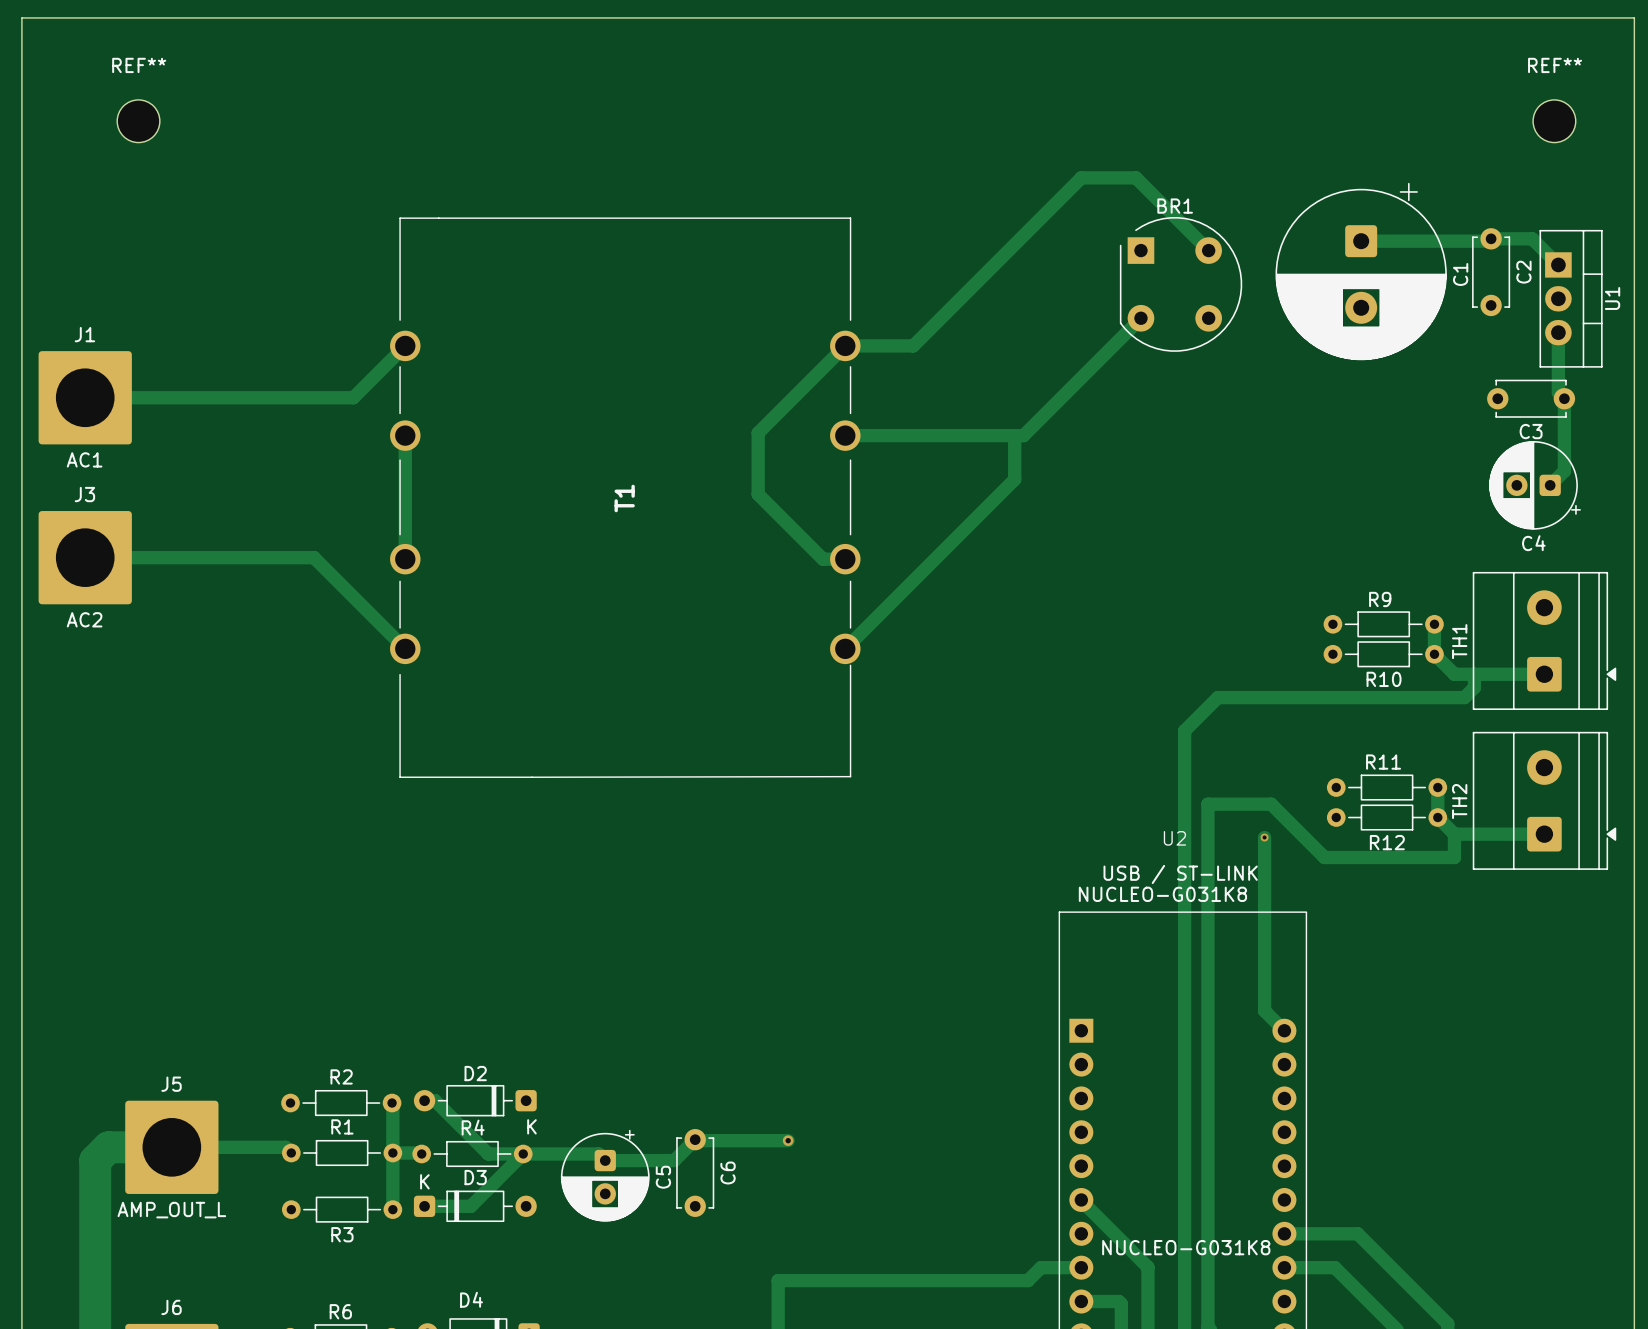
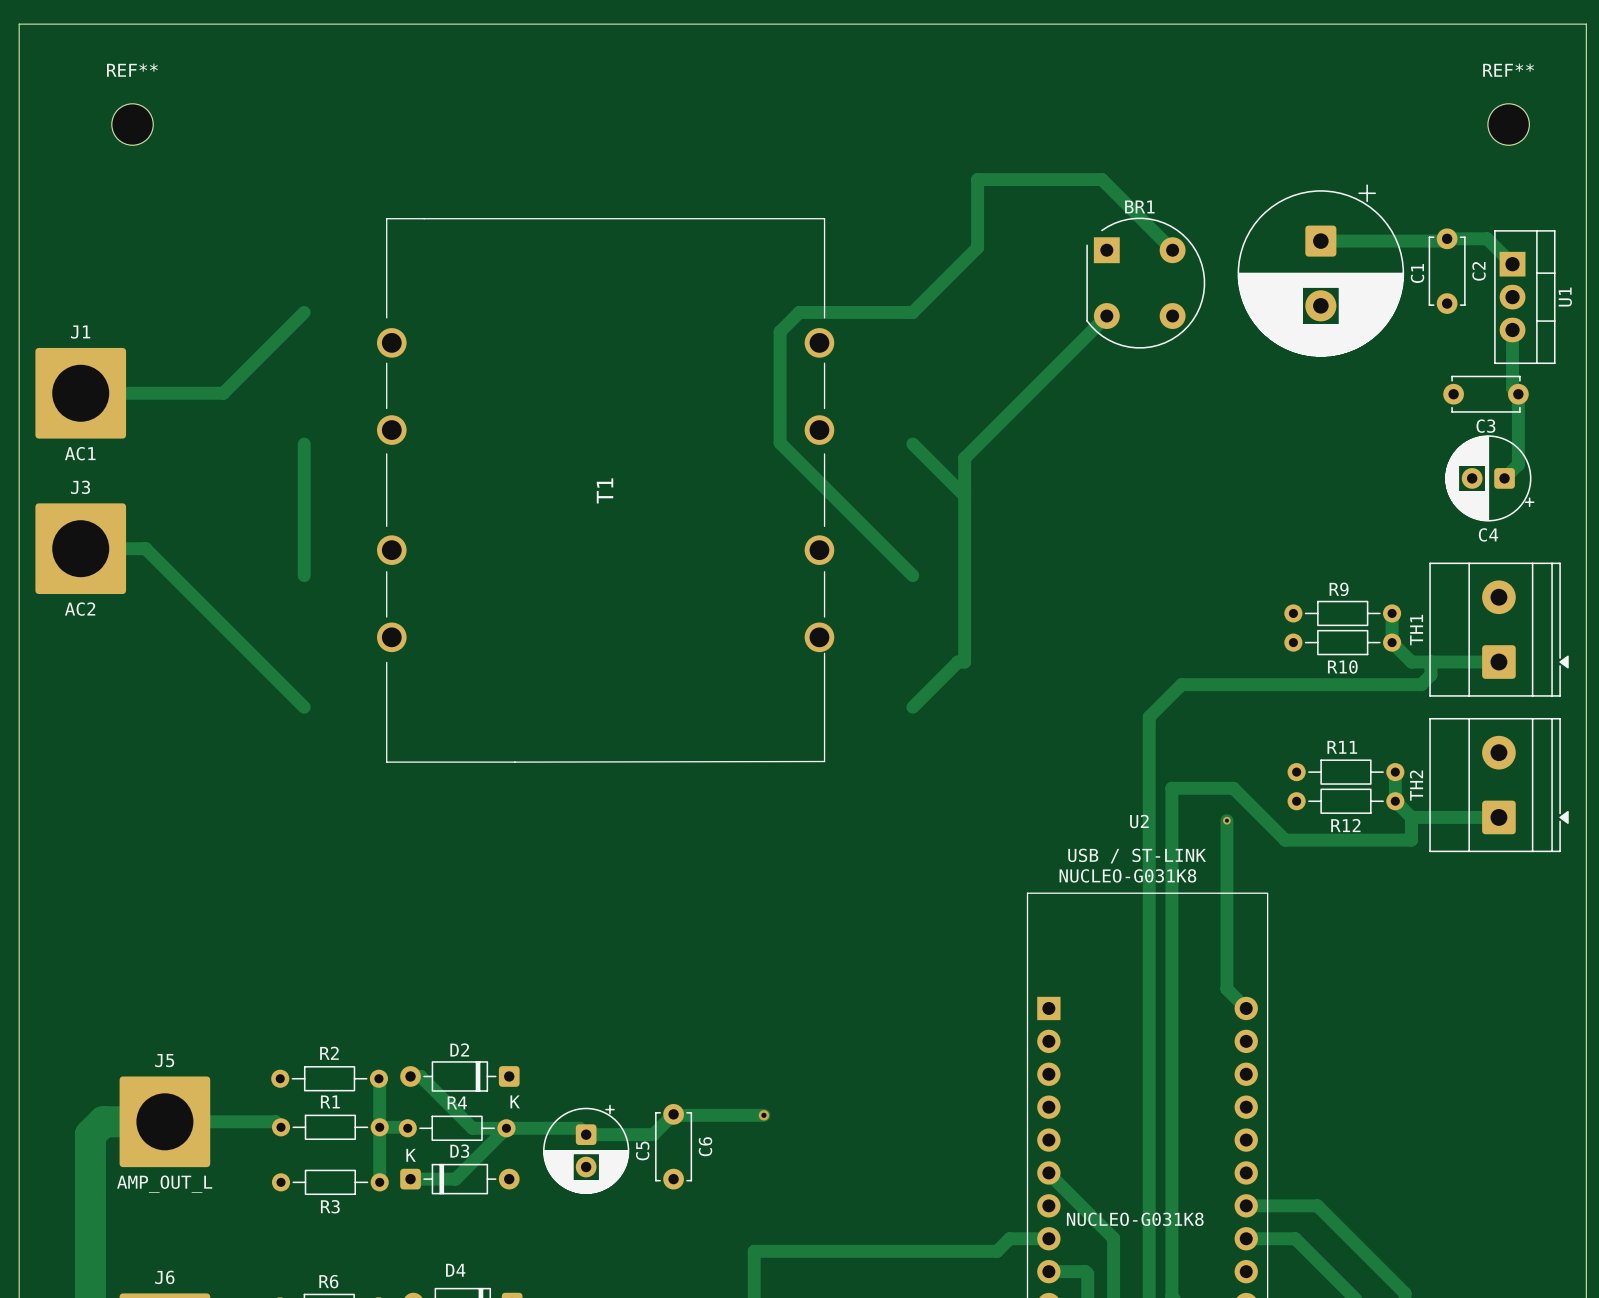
track: (1081, 177) (913, 345) (845, 345) (758, 433) (758, 494) (822, 559) (845, 559) -> (1048, 179) (977, 179) (977, 247) (912, 312) (799, 312) (780, 331) (780, 442) (912, 575)
track: (405, 345) (353, 397) (232, 397) -> (304, 312) (223, 393)
track: (405, 435) (405, 559) -> none
track: (845, 435) (1023, 435) -> (912, 707) (958, 662) (964, 662) (964, 458) (992, 430)
track: (1014, 435) (1014, 479) (845, 648) -> none
track: none -> (304, 444) (304, 575)
track: none -> (912, 444) (964, 495)
track: (152, 557) (314, 557) (405, 648) -> (145, 548) (304, 707)

